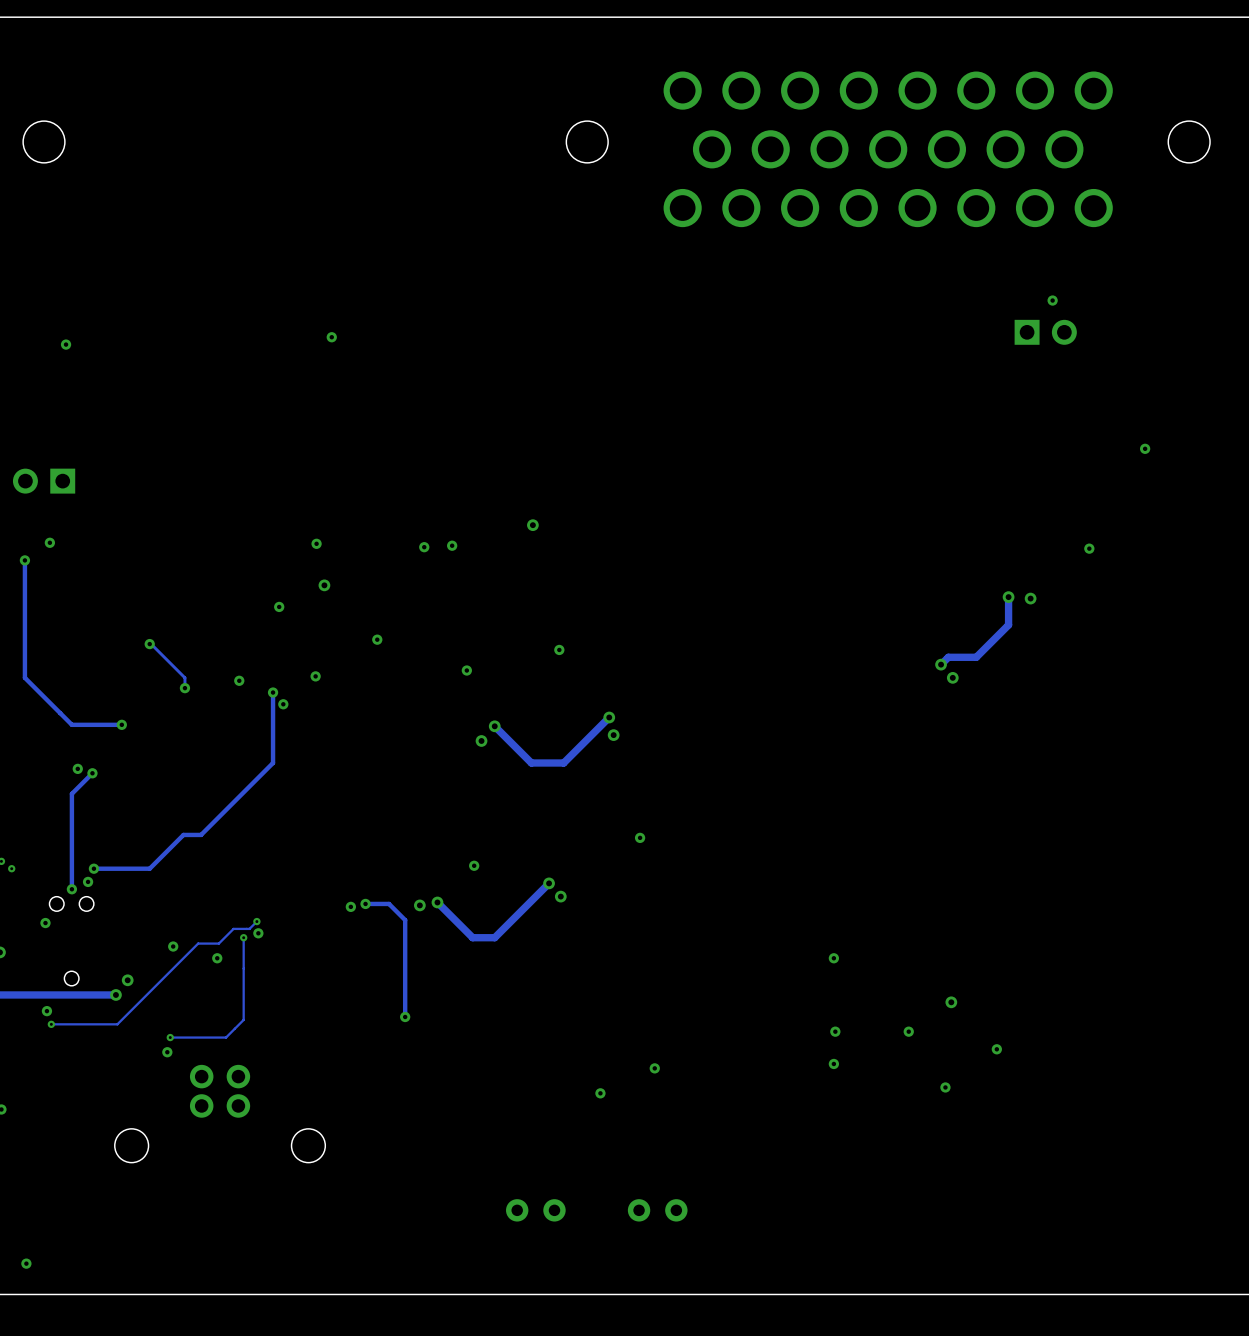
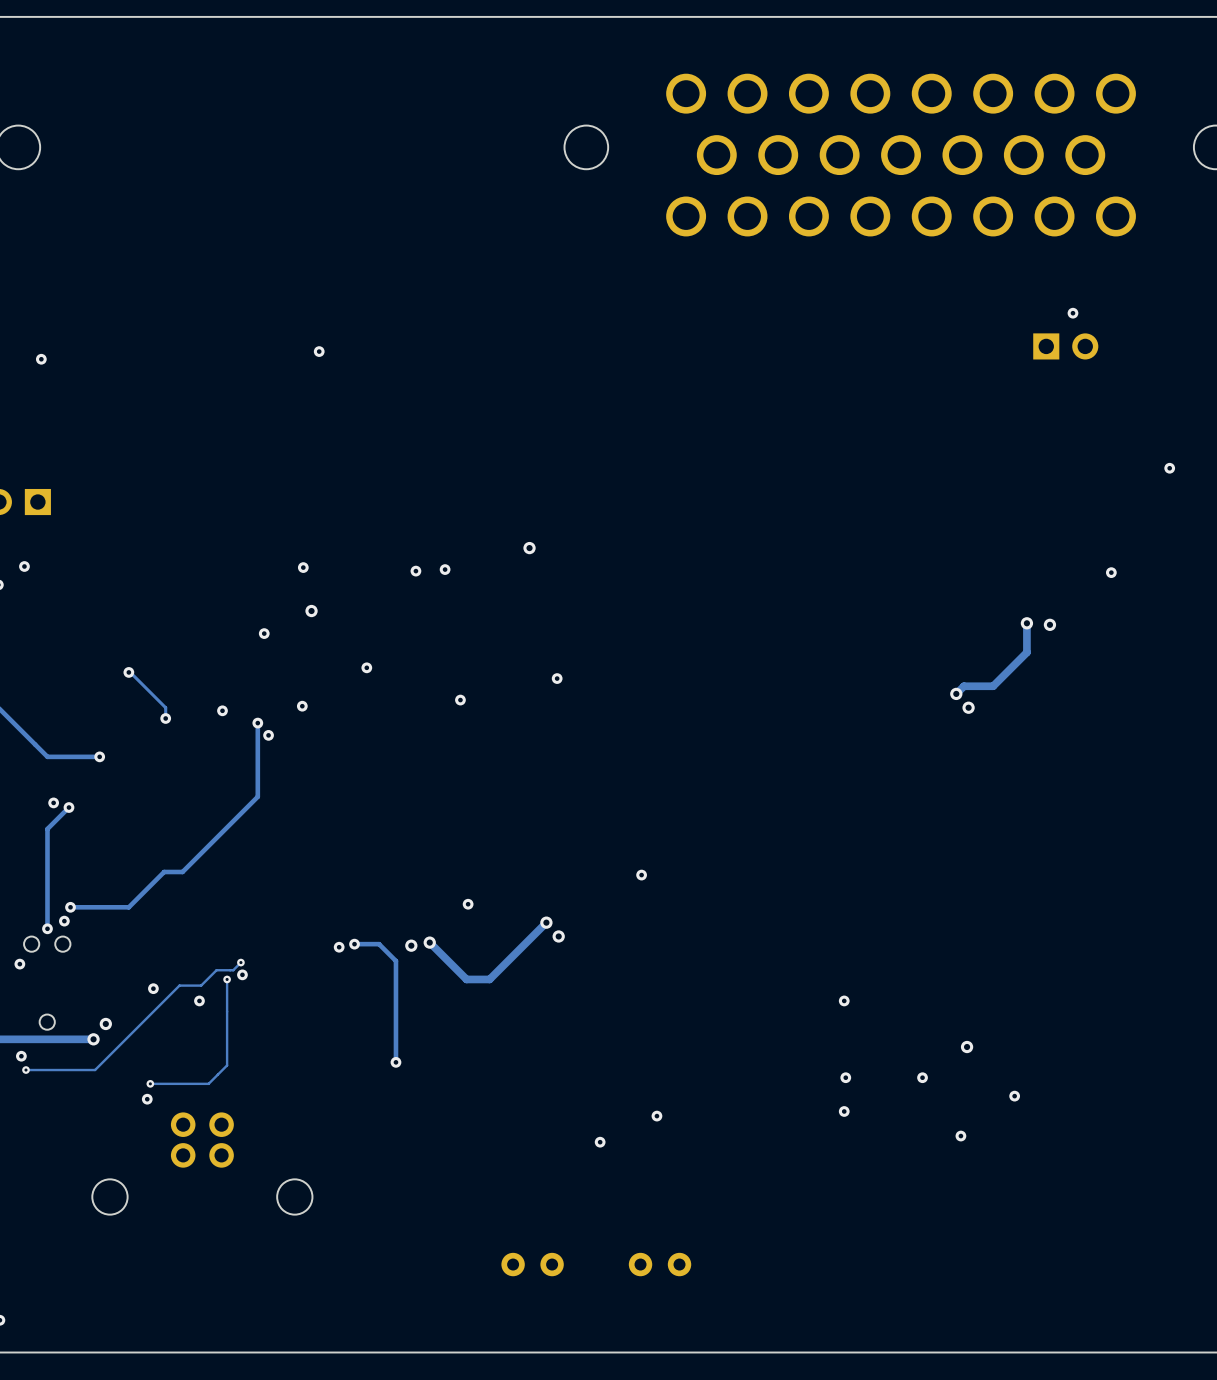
track: (609, 717) (563, 763) (531, 763) (494, 726) -> none
via: (609, 717) -> none
via: (494, 726) -> none
via: (613, 735) -> none
via: (481, 740) -> none

